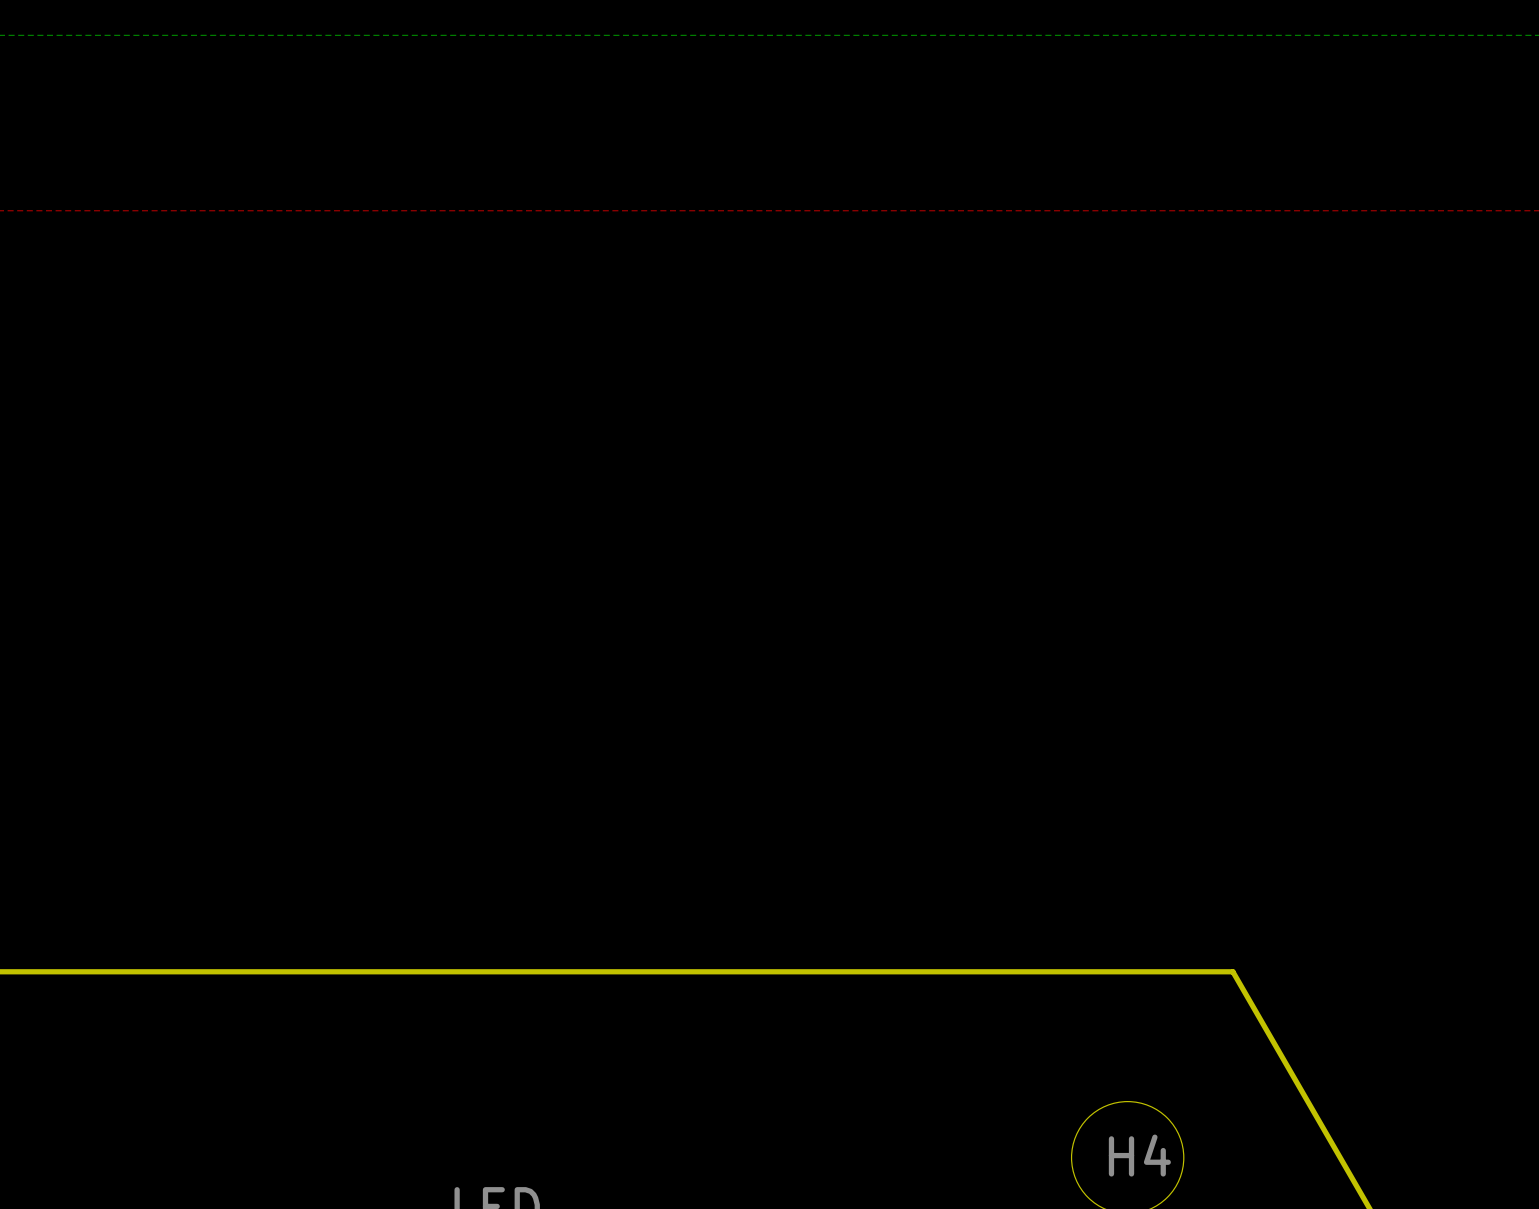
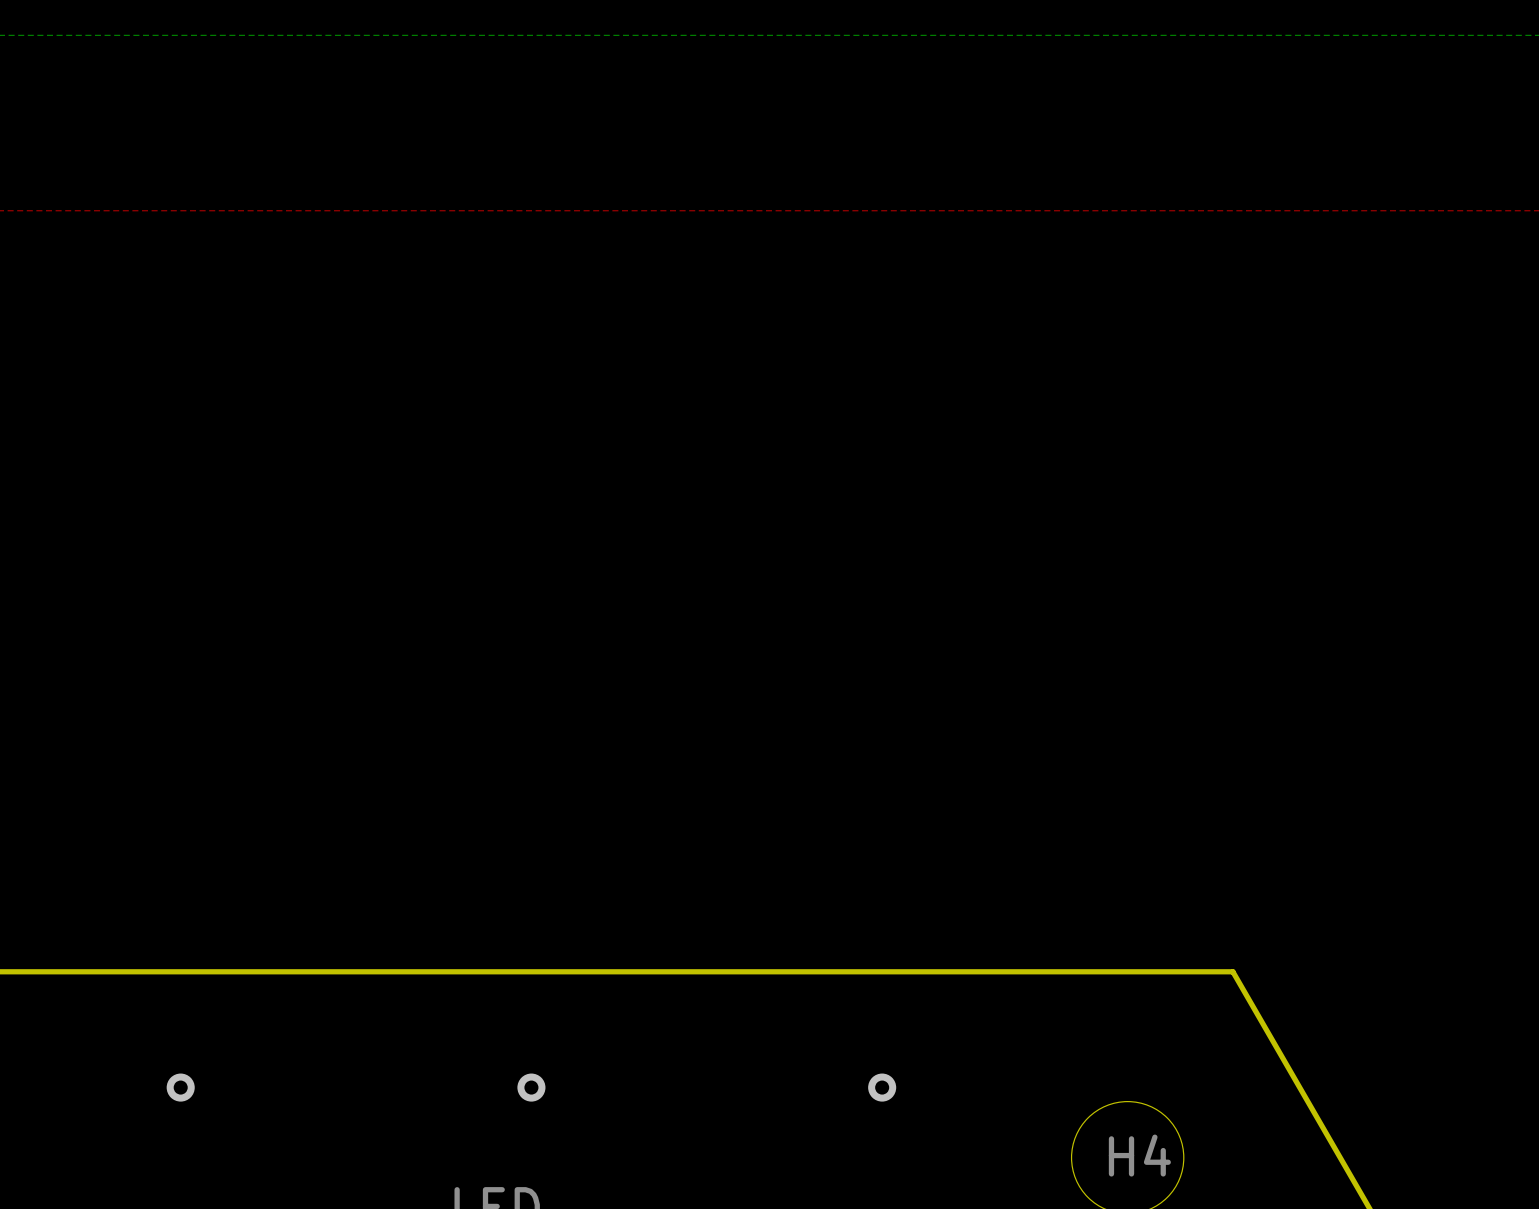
via: none -> (180, 1087)
via: none -> (531, 1087)
via: none -> (882, 1087)

